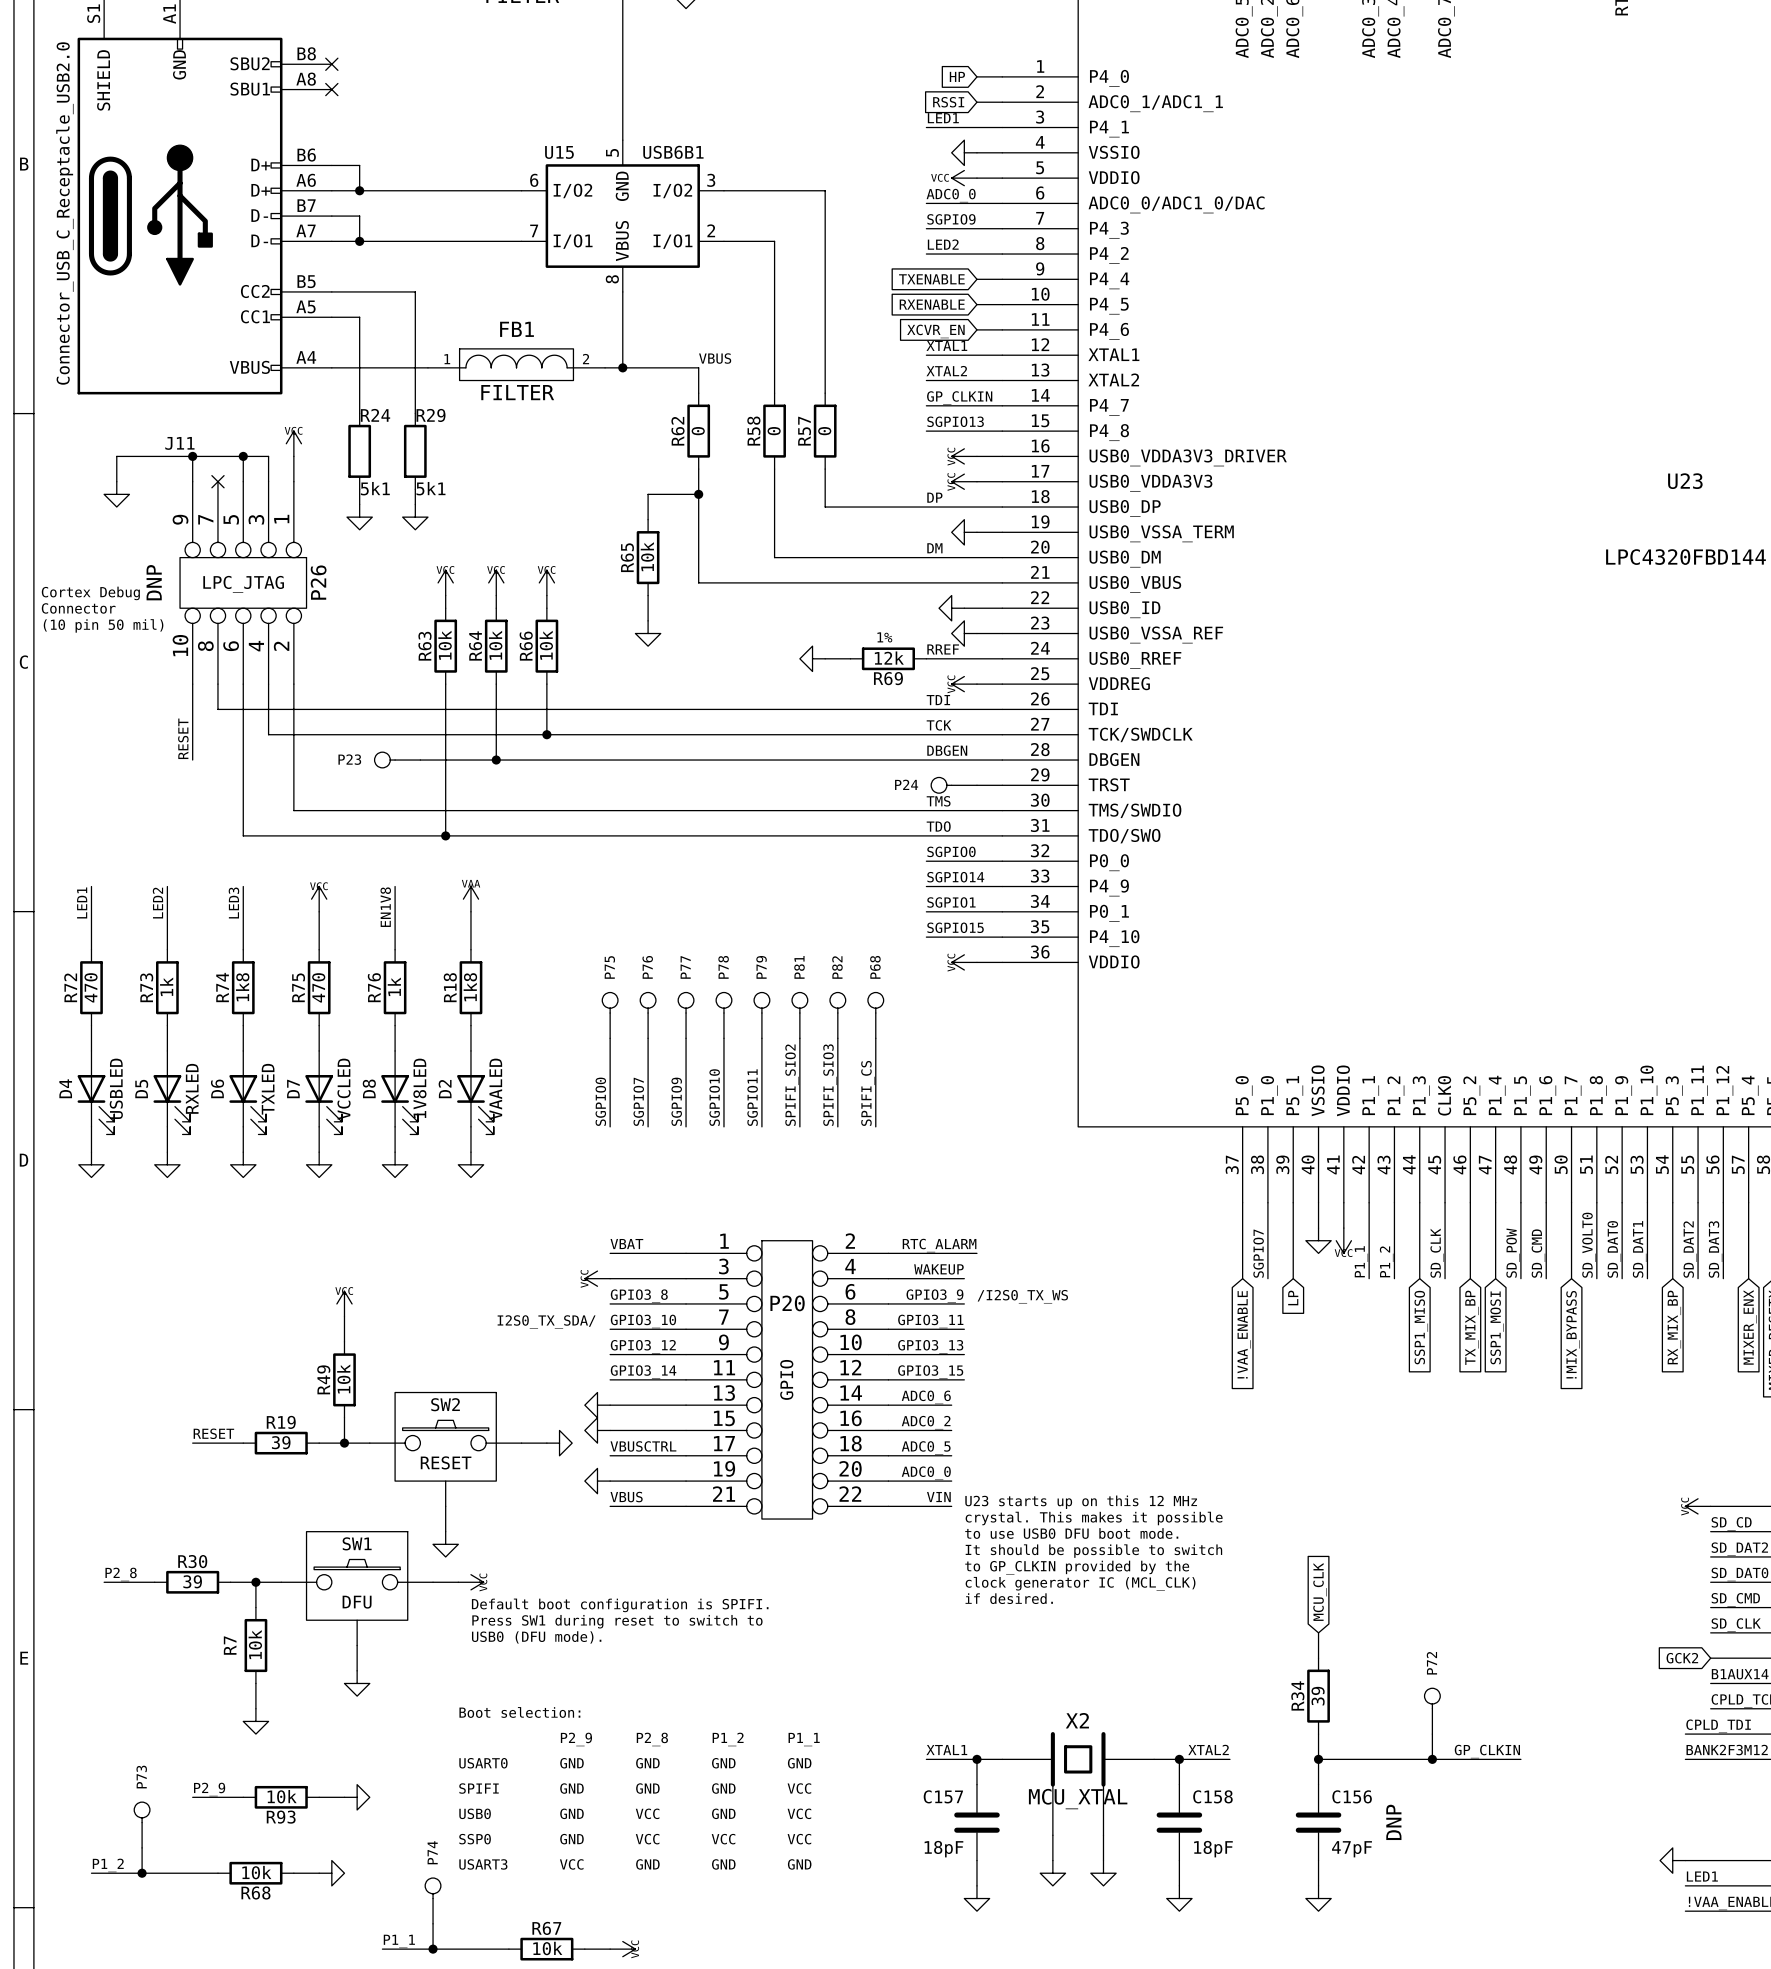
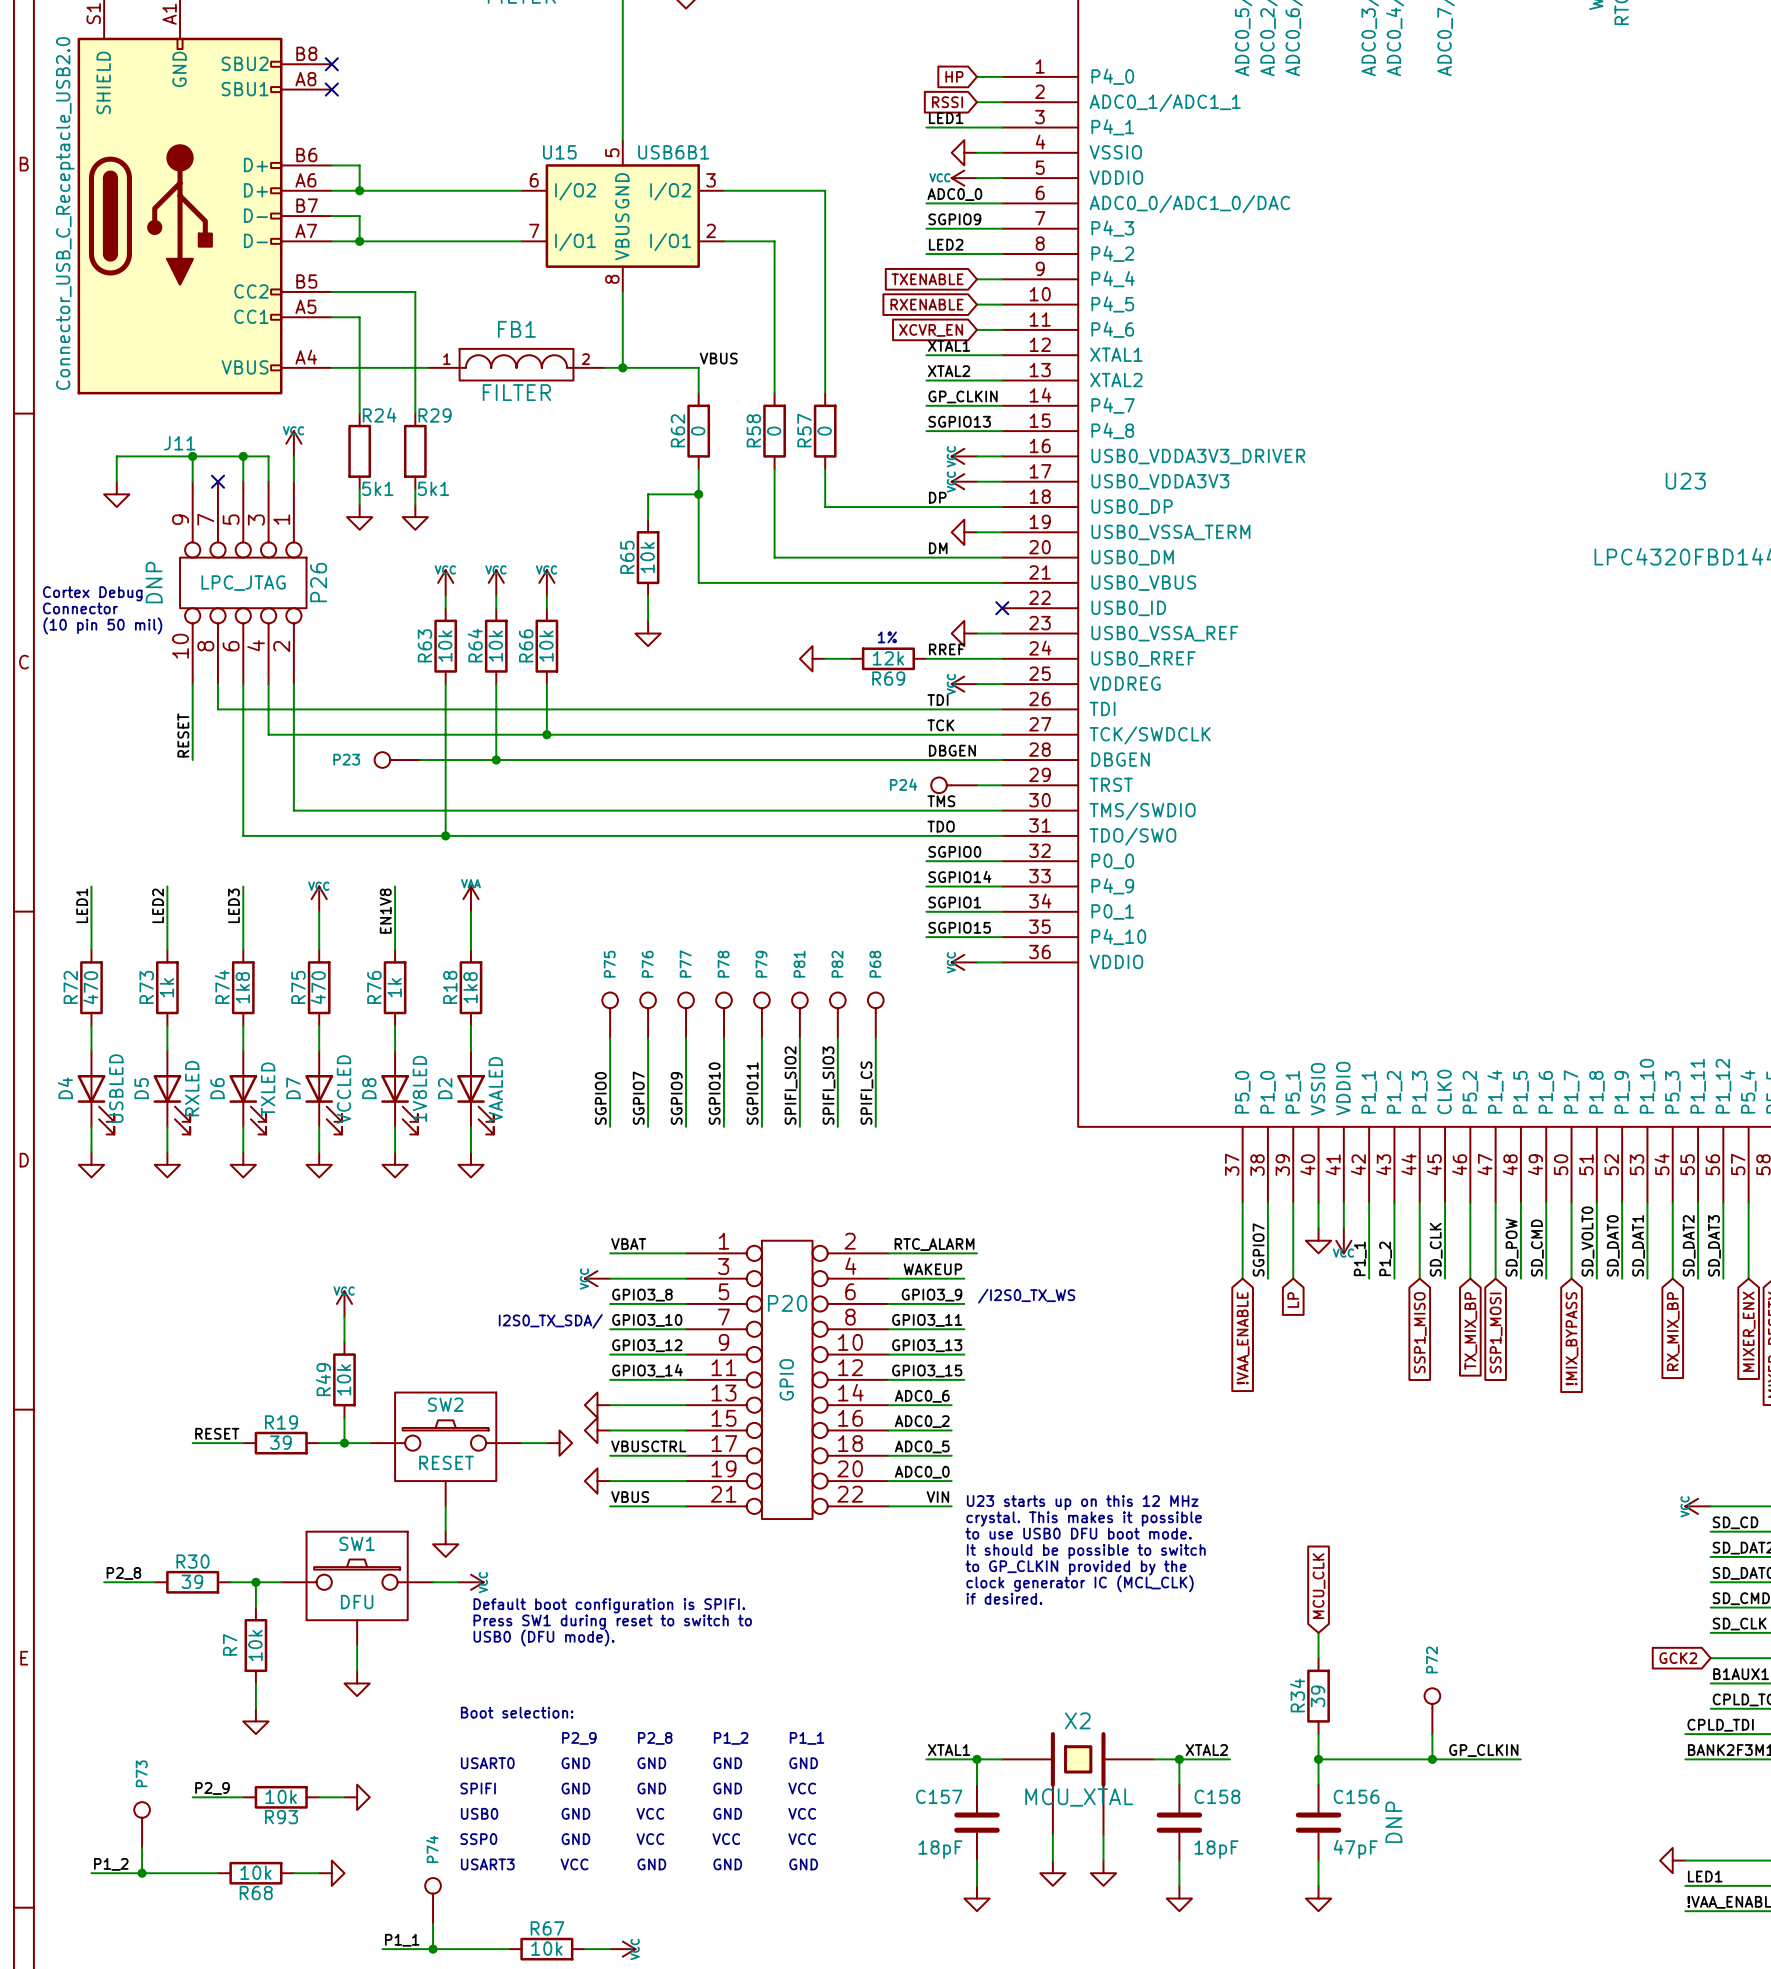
power symbol: (951, 608) -> none
wire: (964, 608) (1002, 608) -> none
no-connect mark: none -> (1002, 608)

